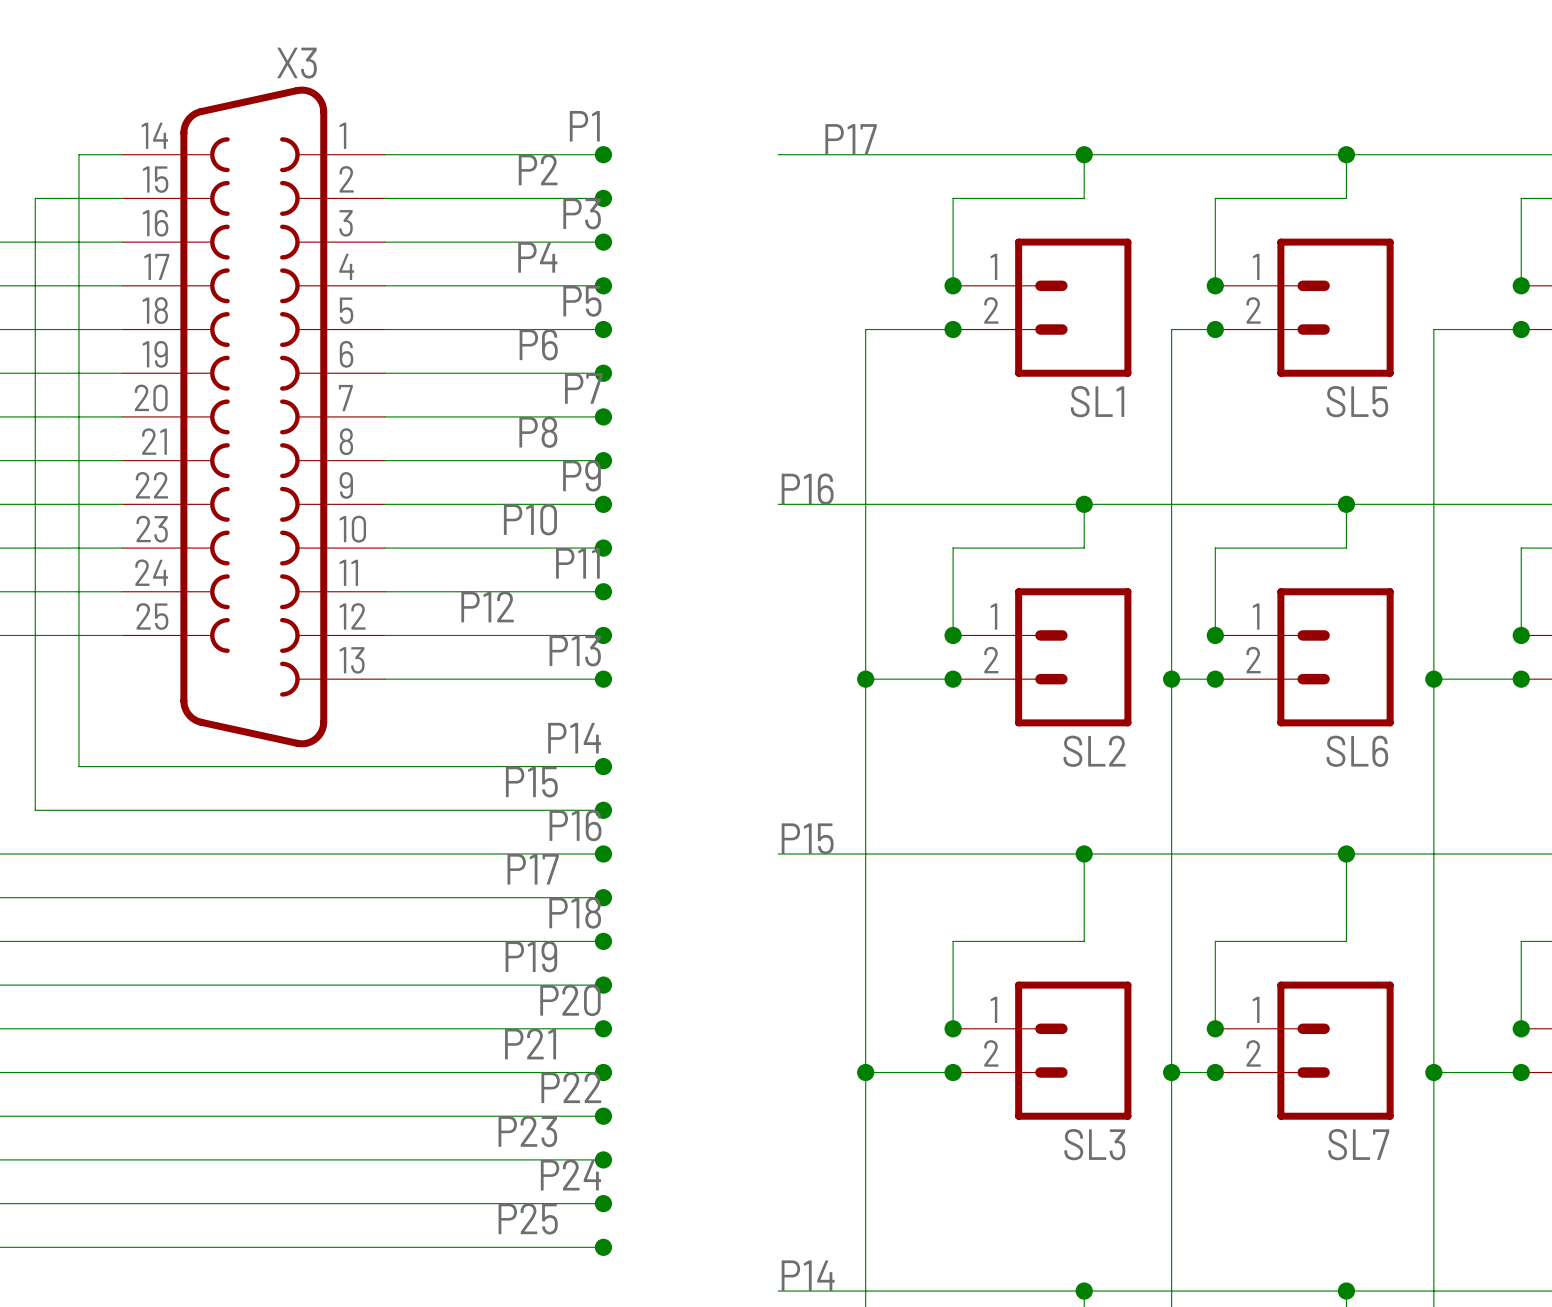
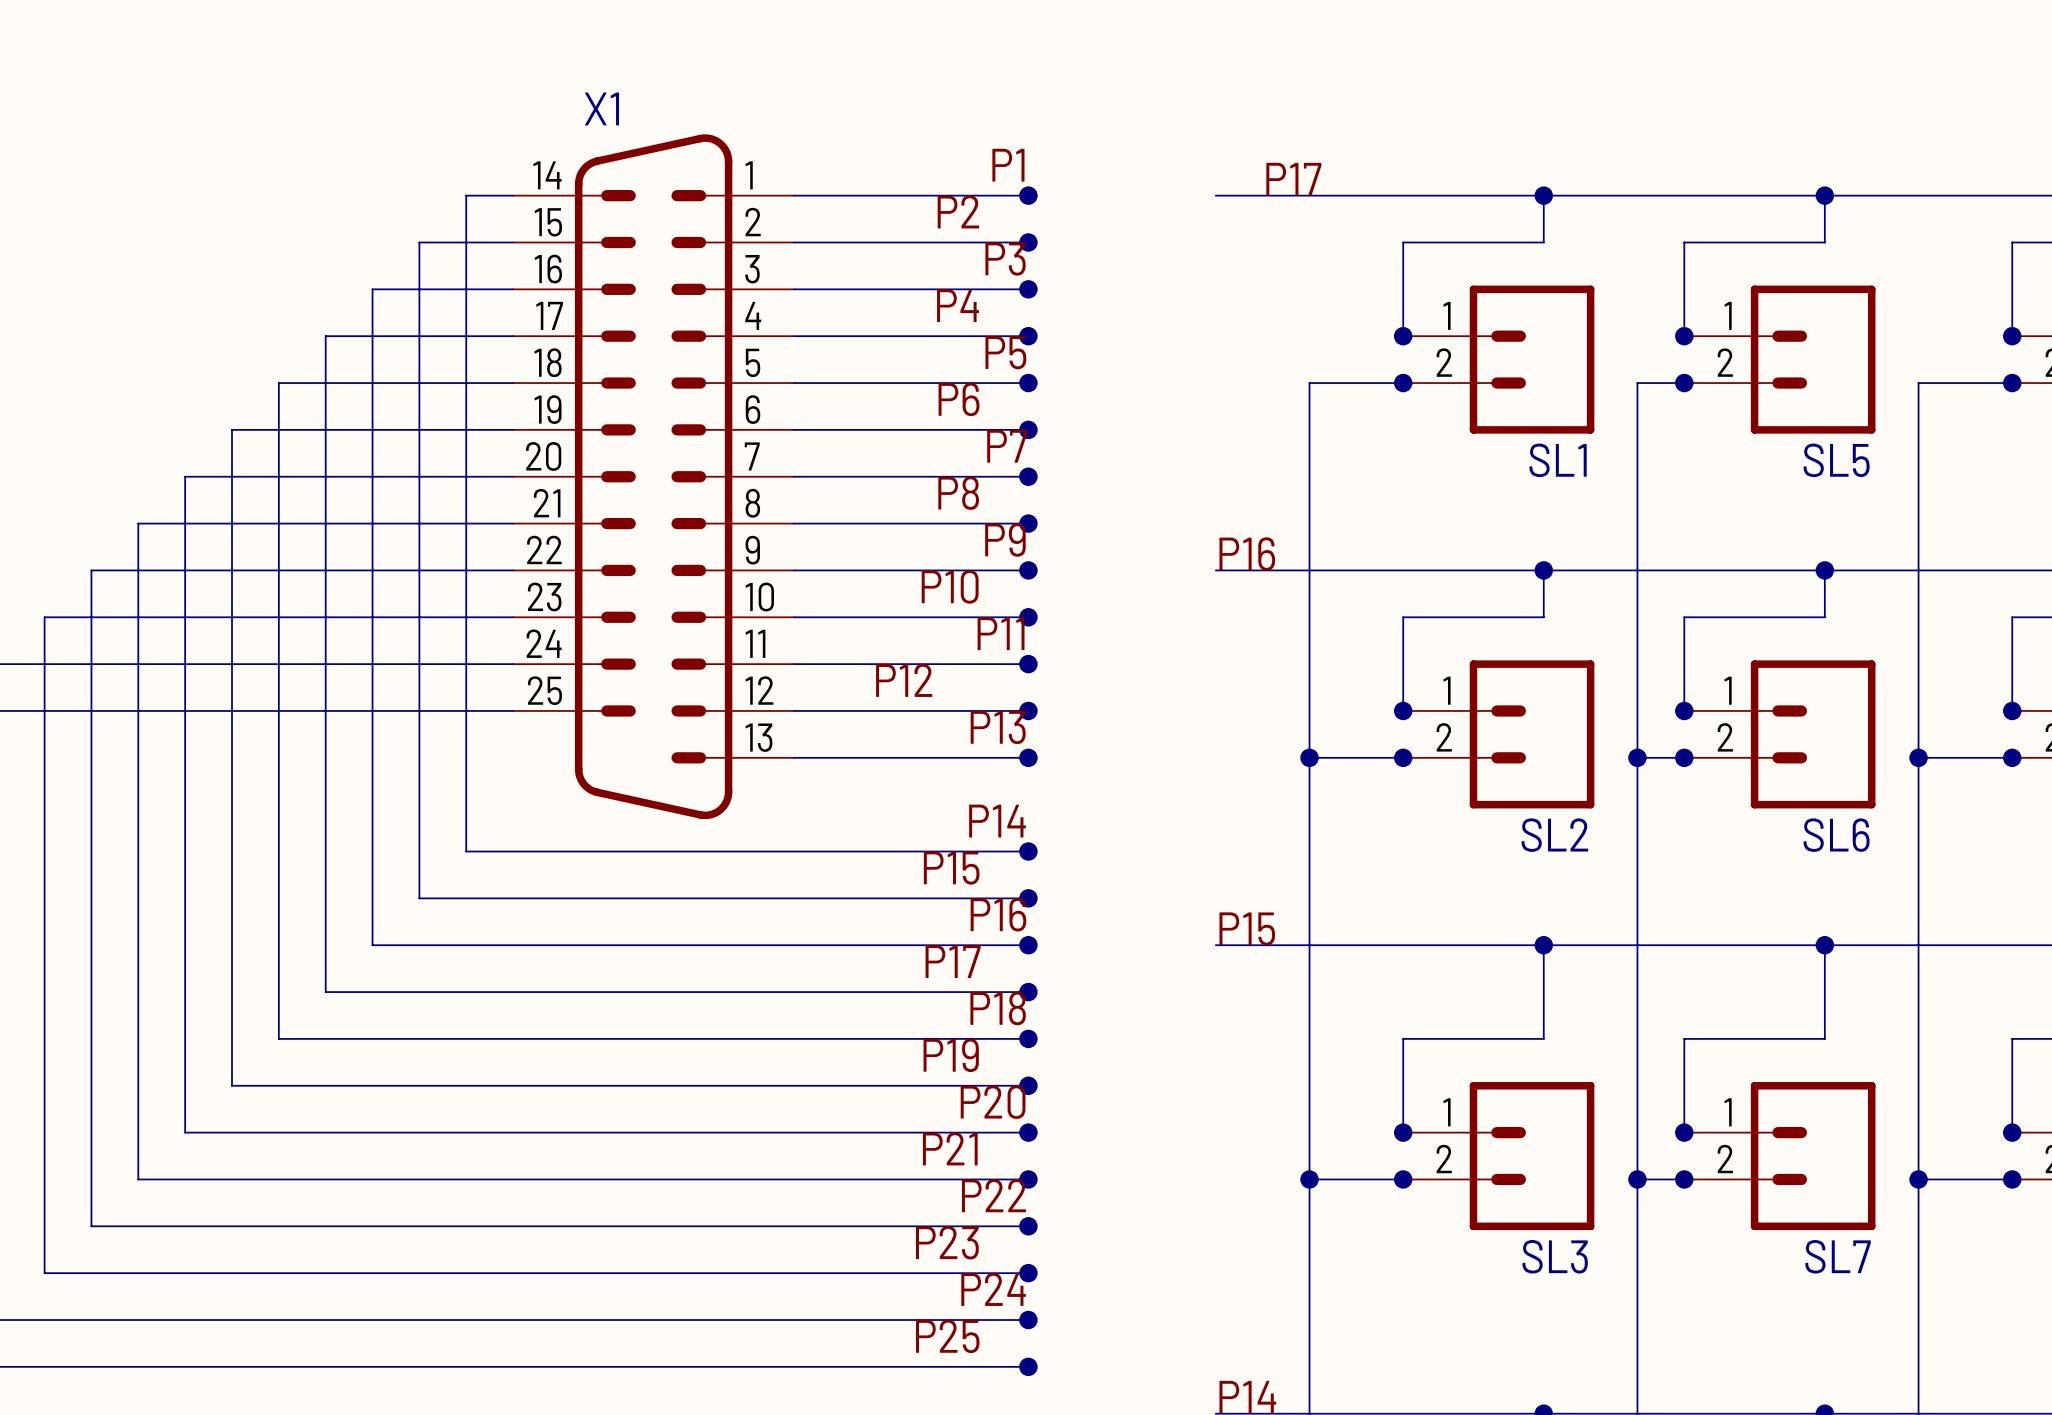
X3: (253, 416) -> none
X1: none -> (653, 476)

